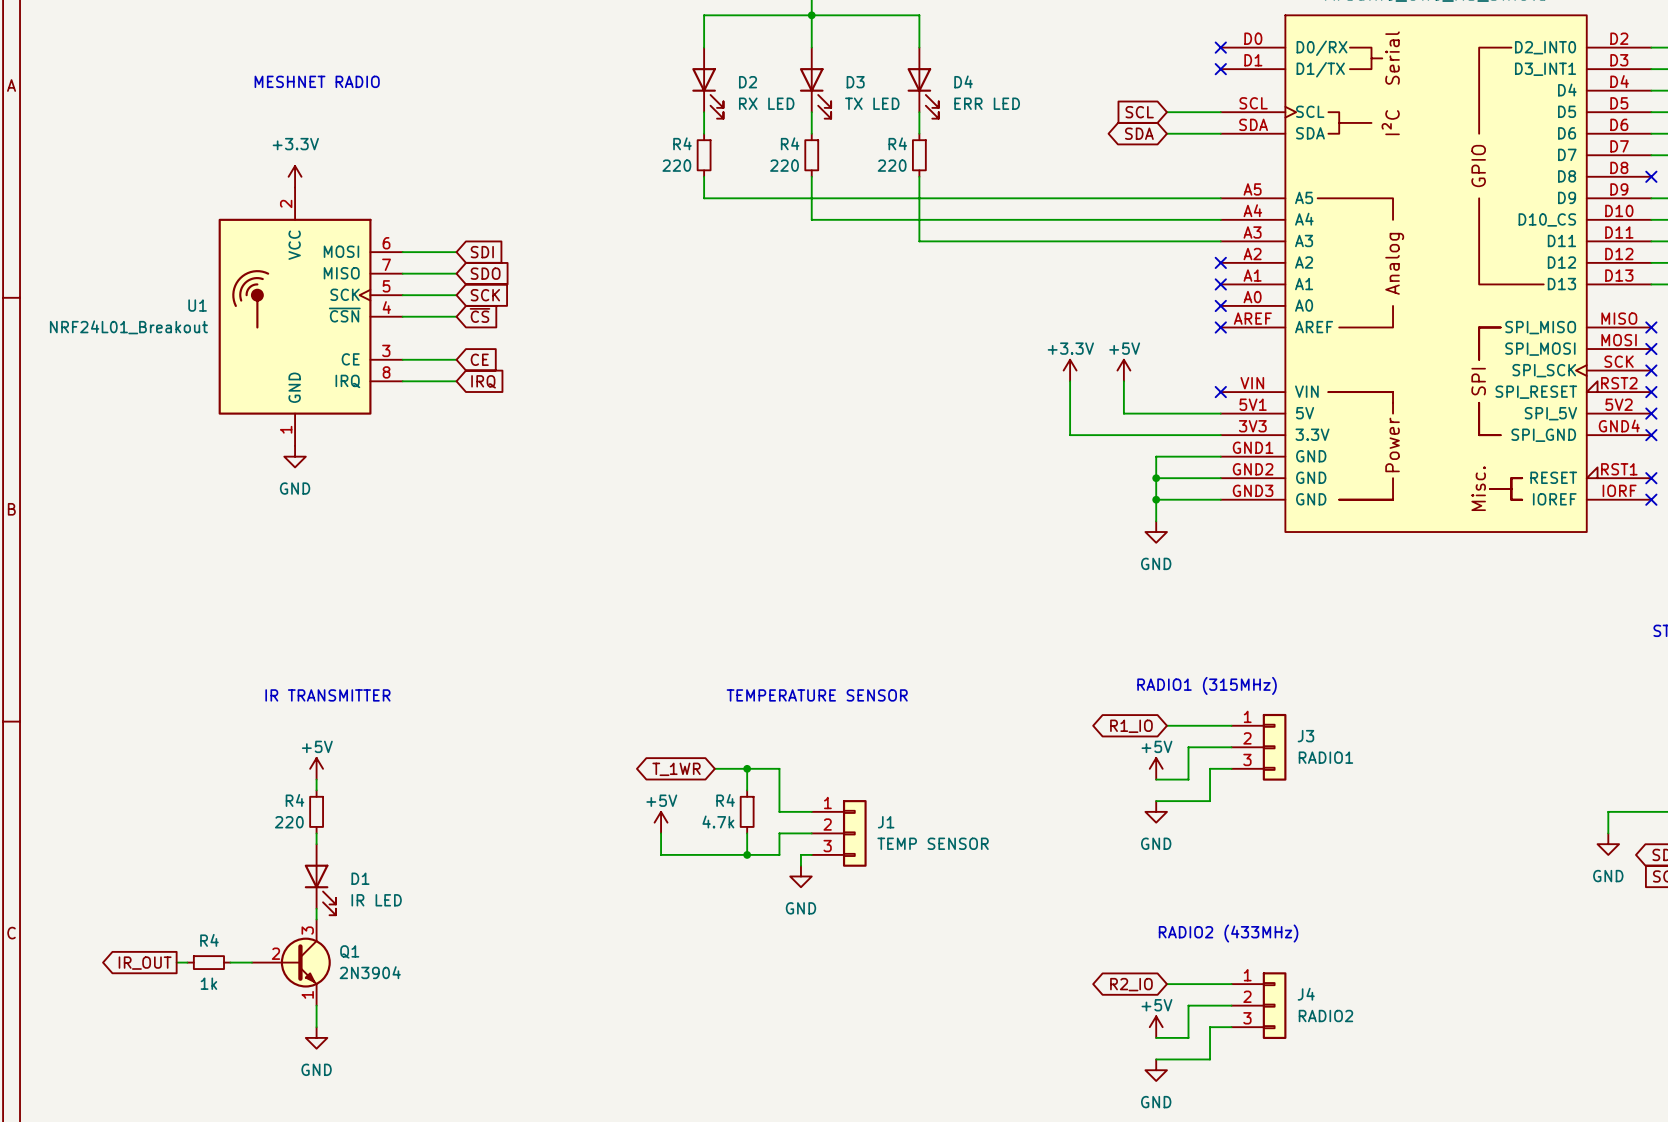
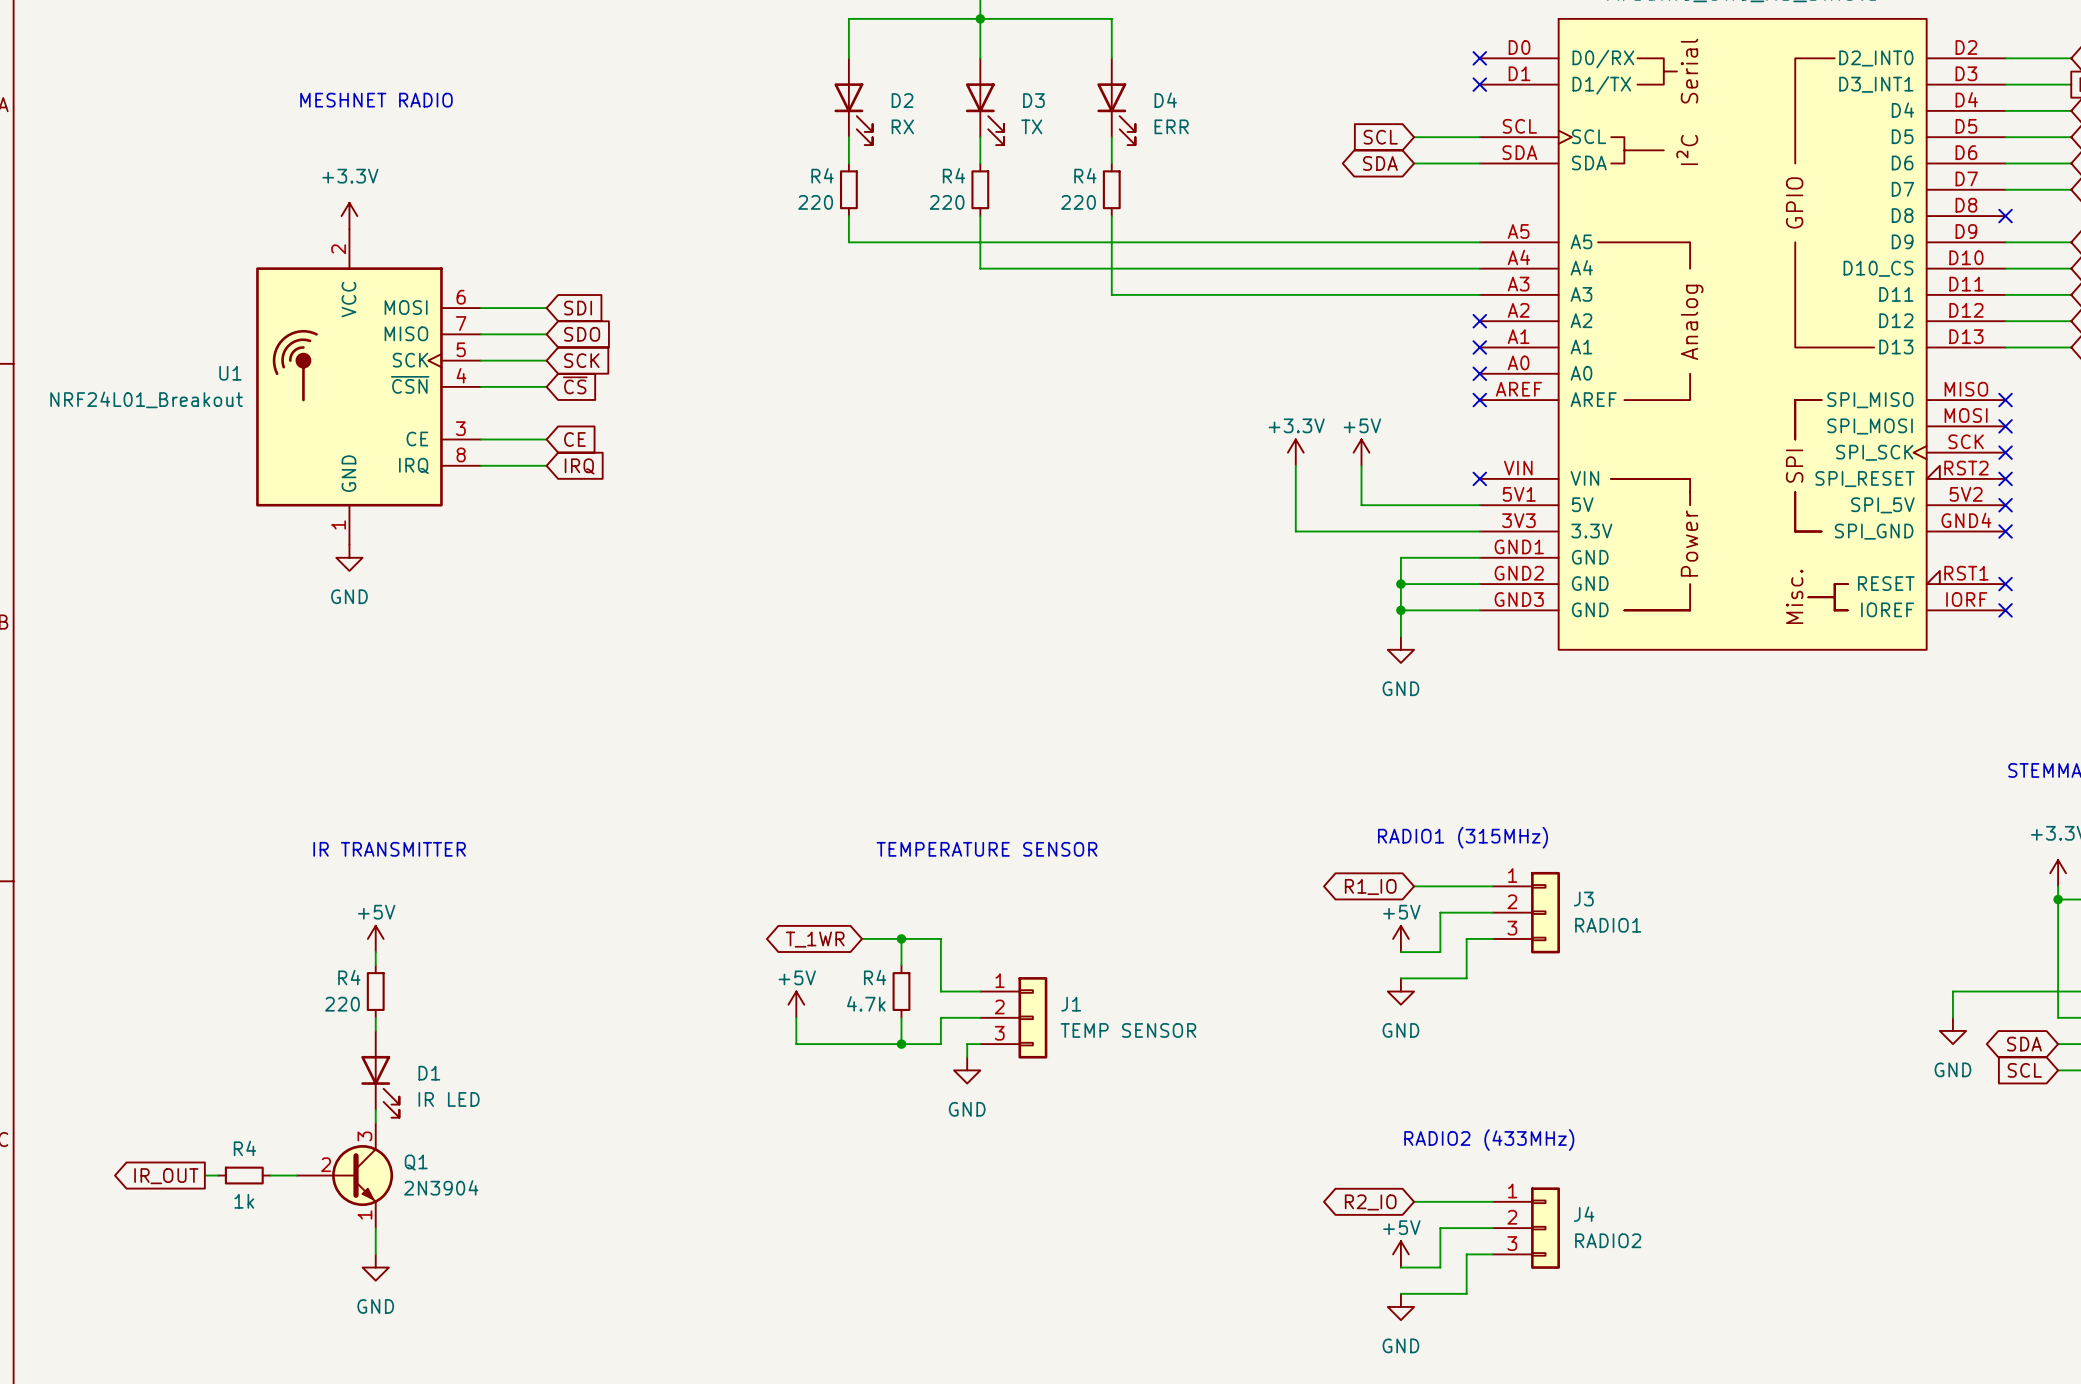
D2 value: RX LED (766, 103) -> RX (902, 126)
D3 value: TX LED (872, 103) -> TX (1031, 126)
D4 value: ERR LED (987, 103) -> ERR (1171, 126)

